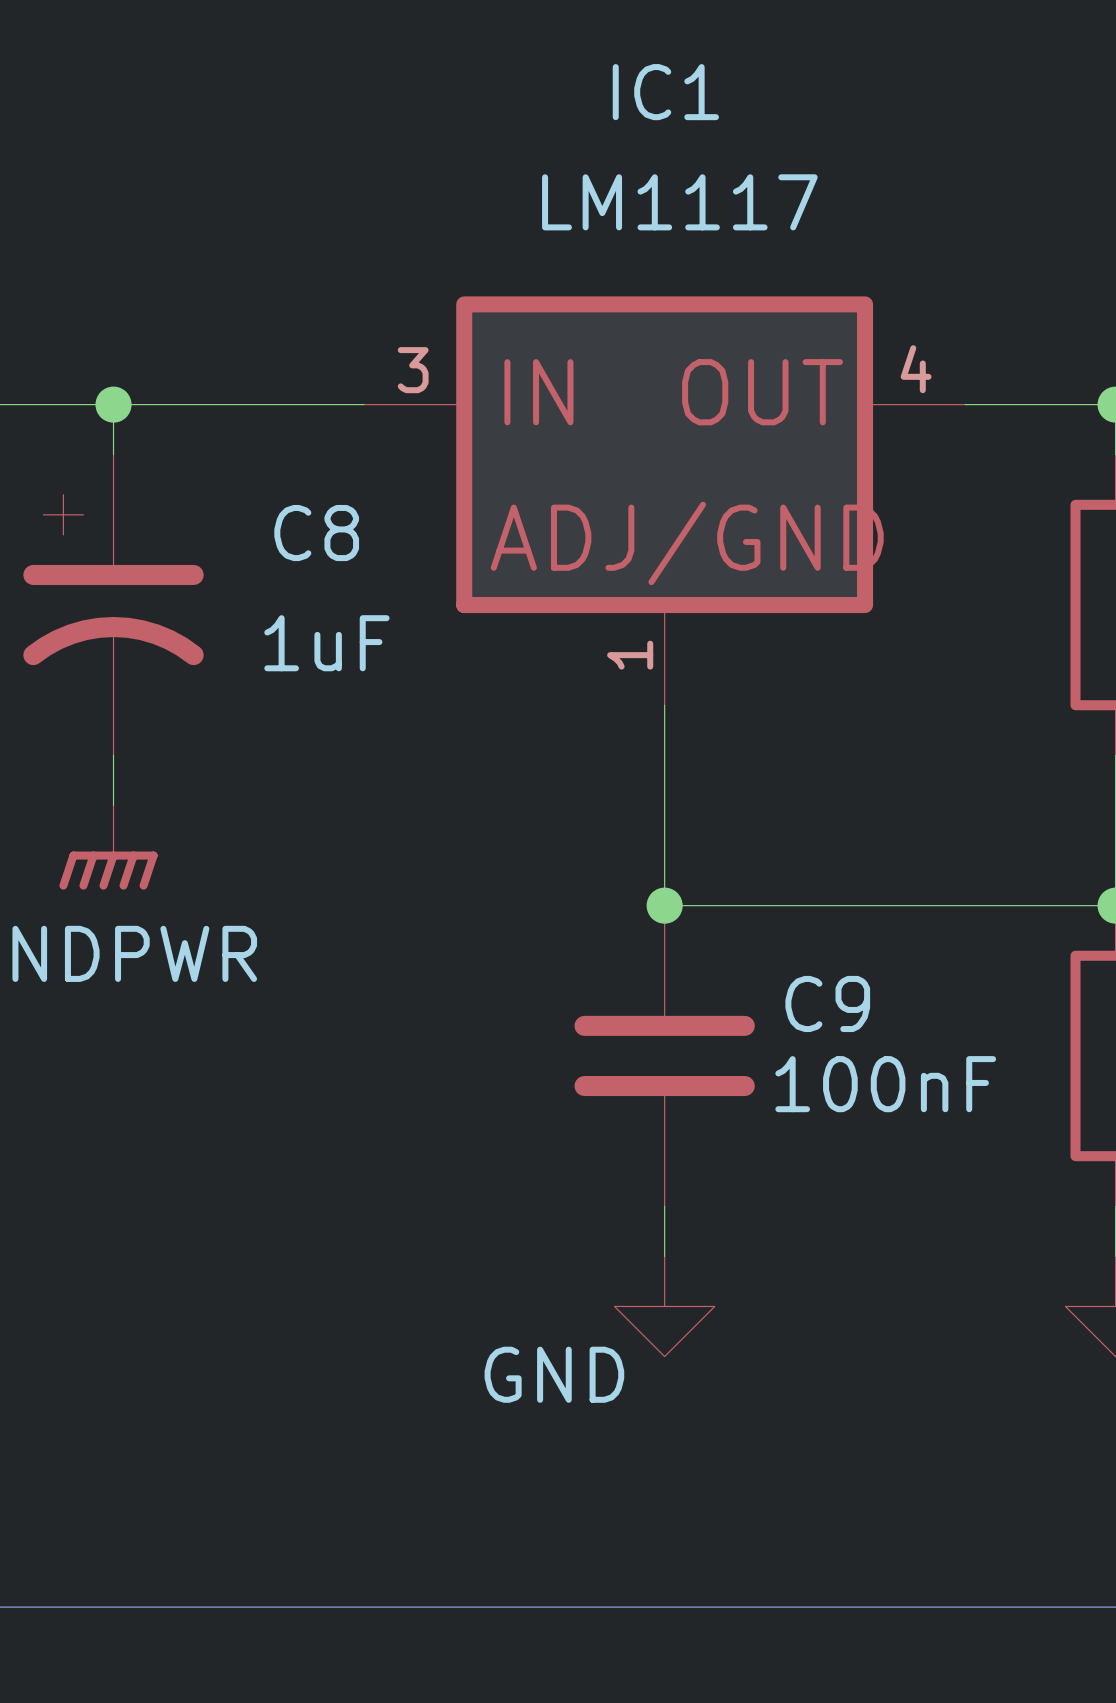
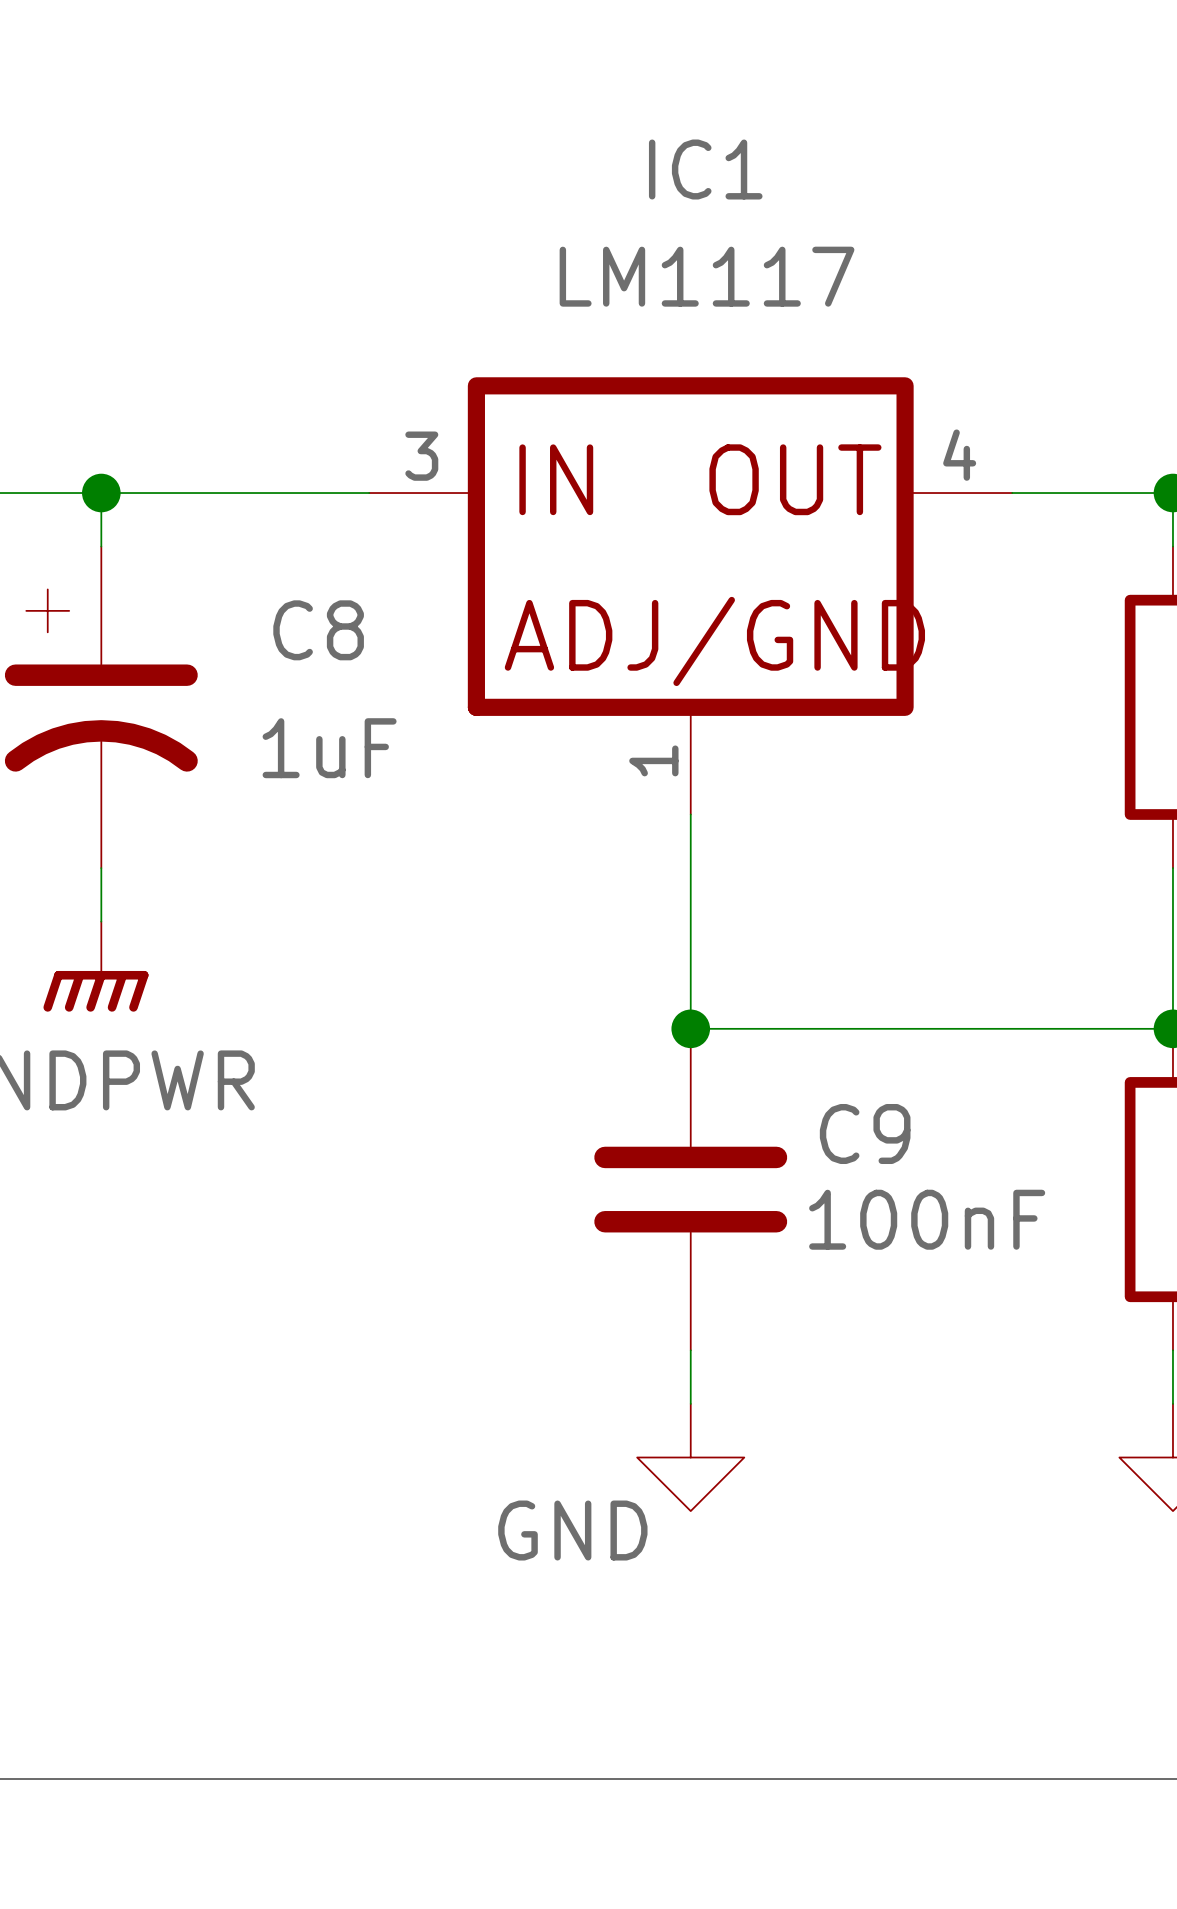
IC1 name position: IC1 (665, 92) -> IC1 (705, 169)

